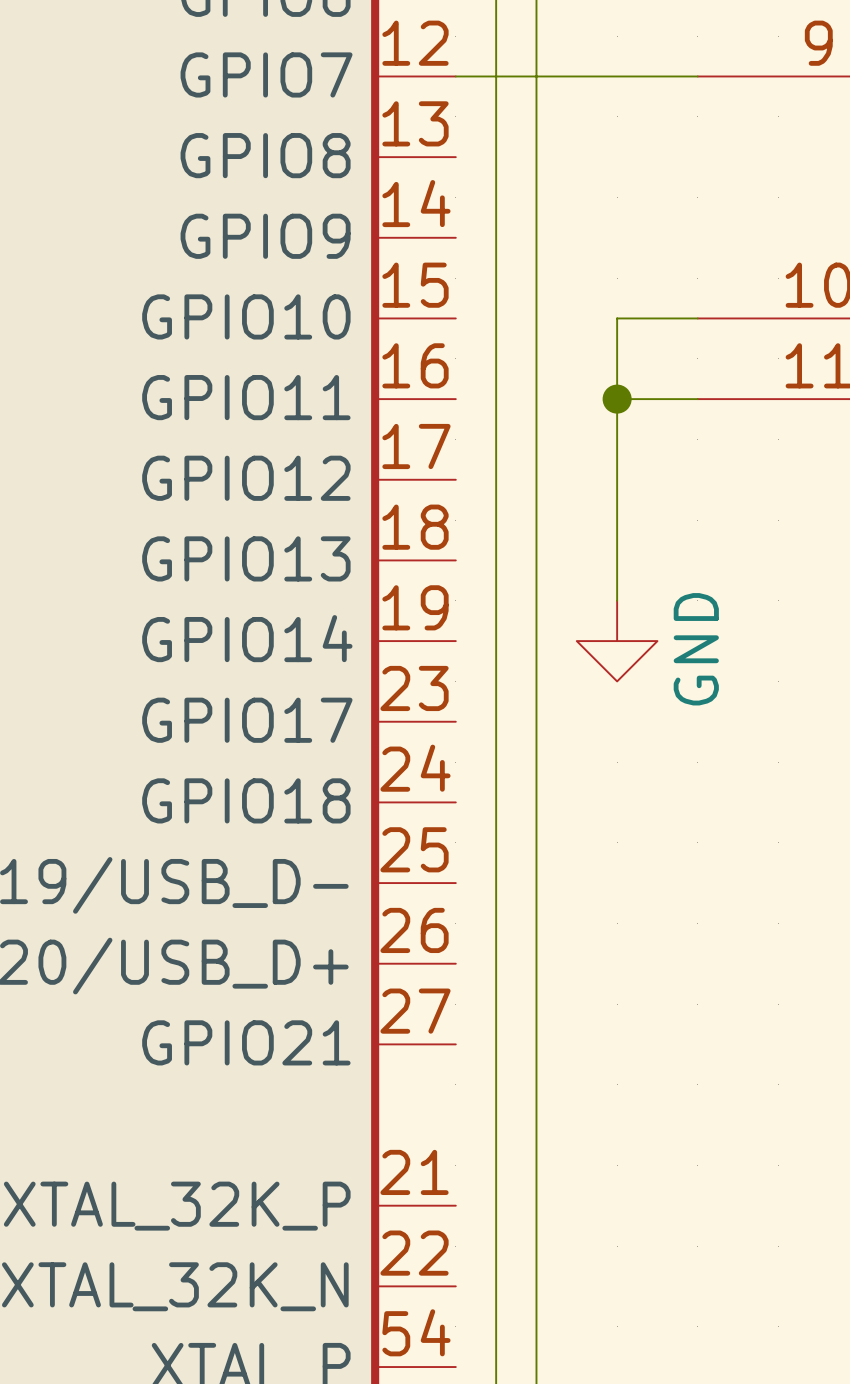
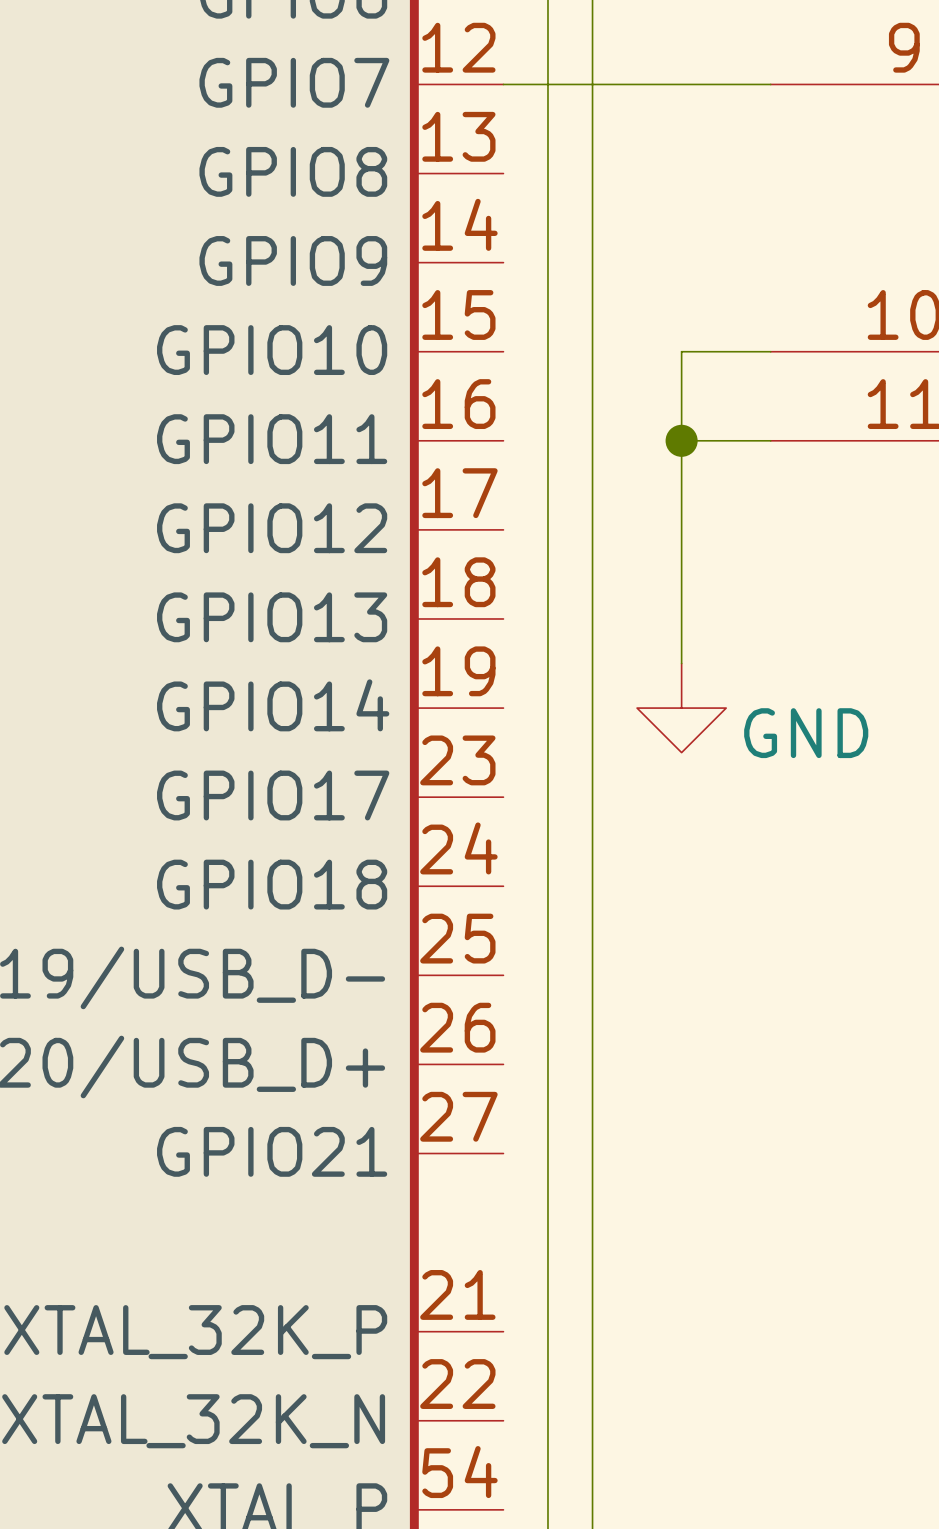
power symbol text rotation: 0° (696, 649) -> 90° clockwise (806, 733)

